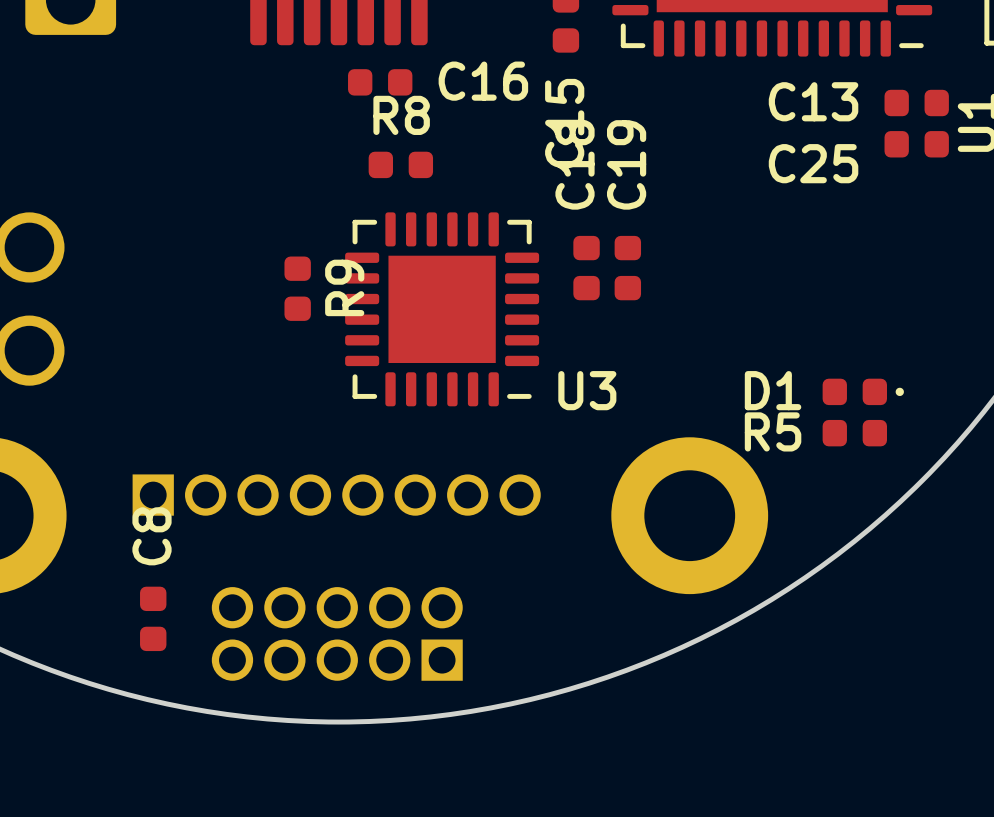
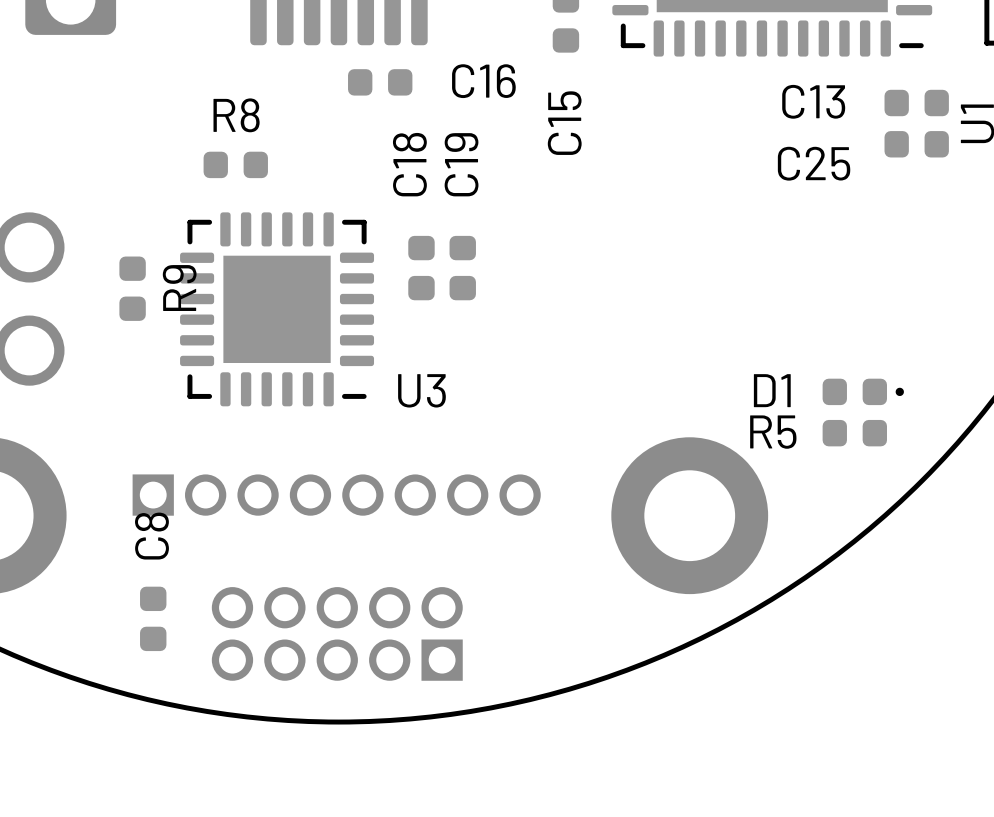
R8 position: (400, 164) -> (235, 164)
C18 position: (586, 268) -> (421, 268)
C19 position: (627, 268) -> (462, 268)
R9 position: (297, 288) -> (132, 288)
U3 position: (442, 309) -> (277, 309)

